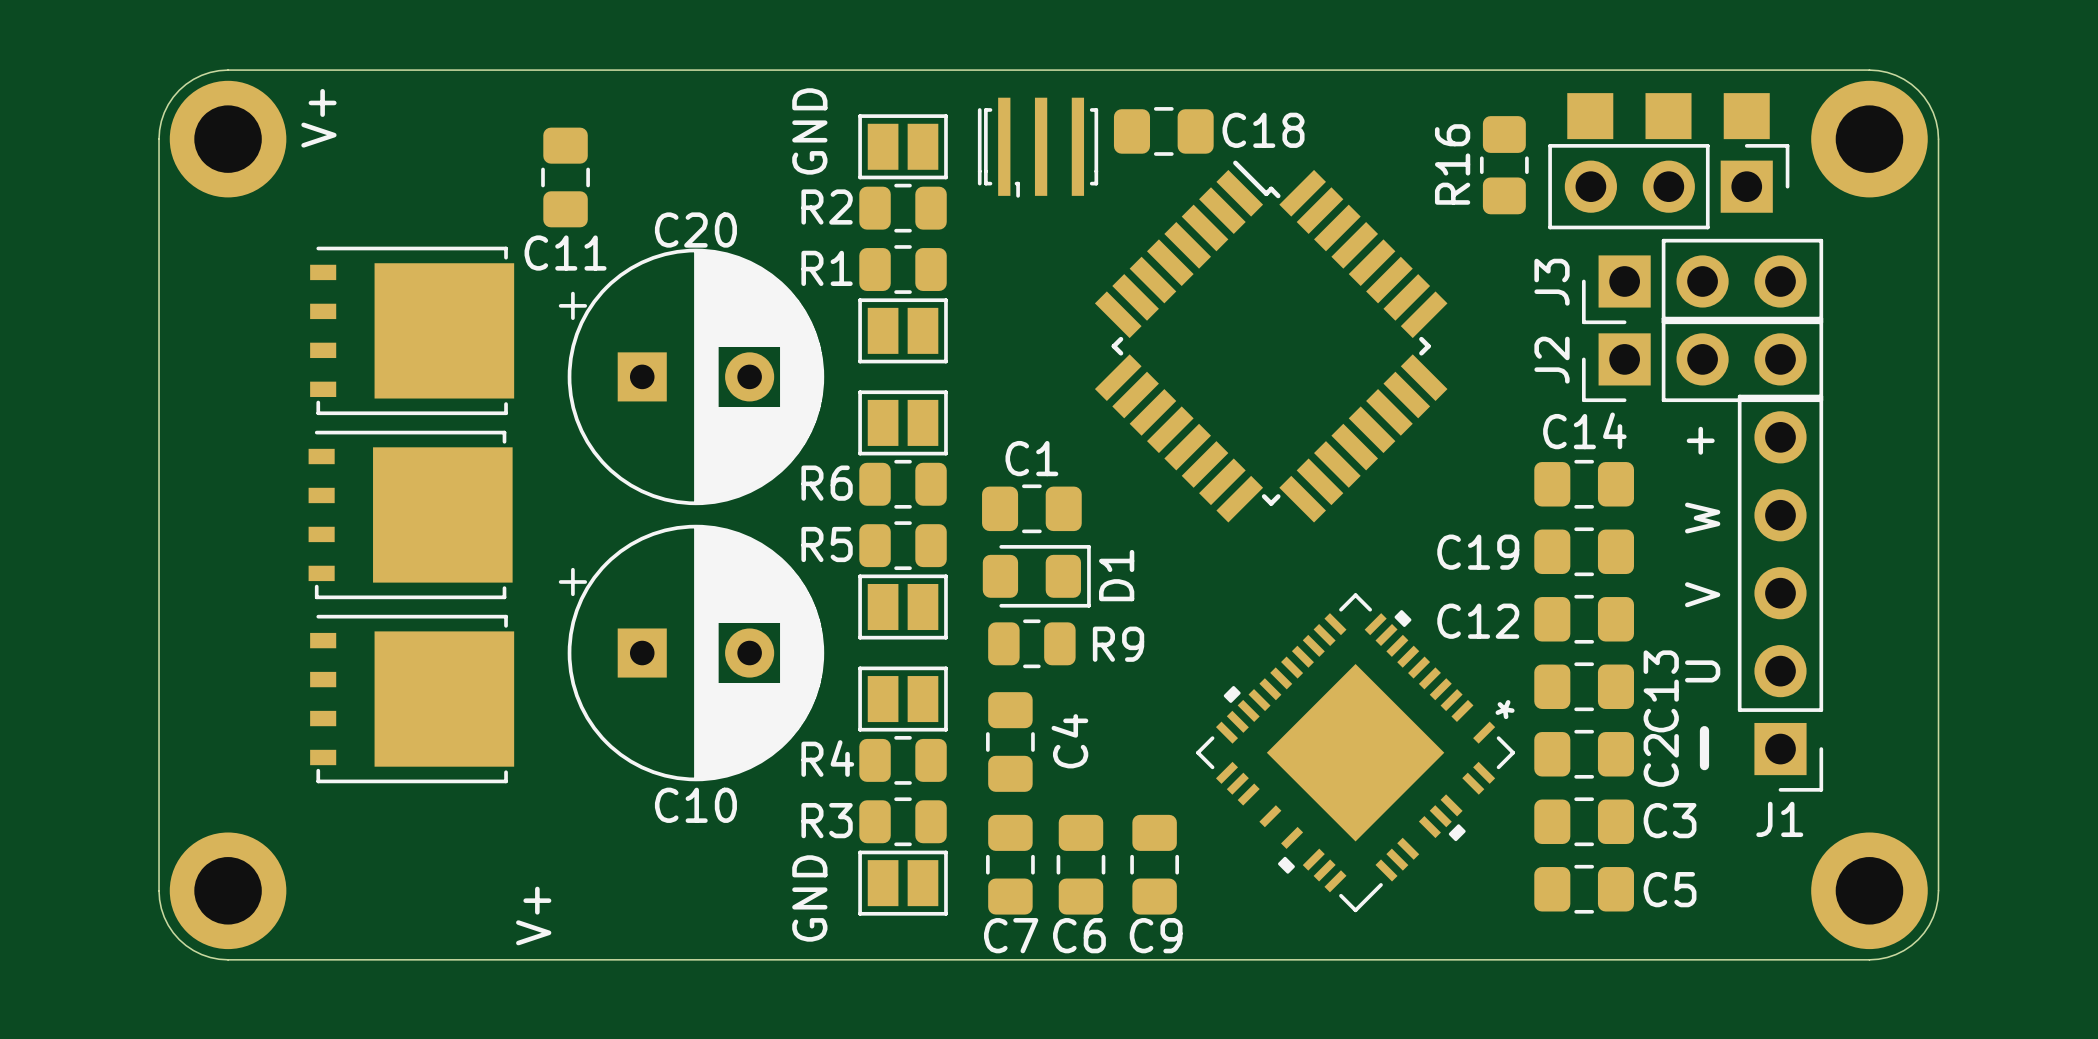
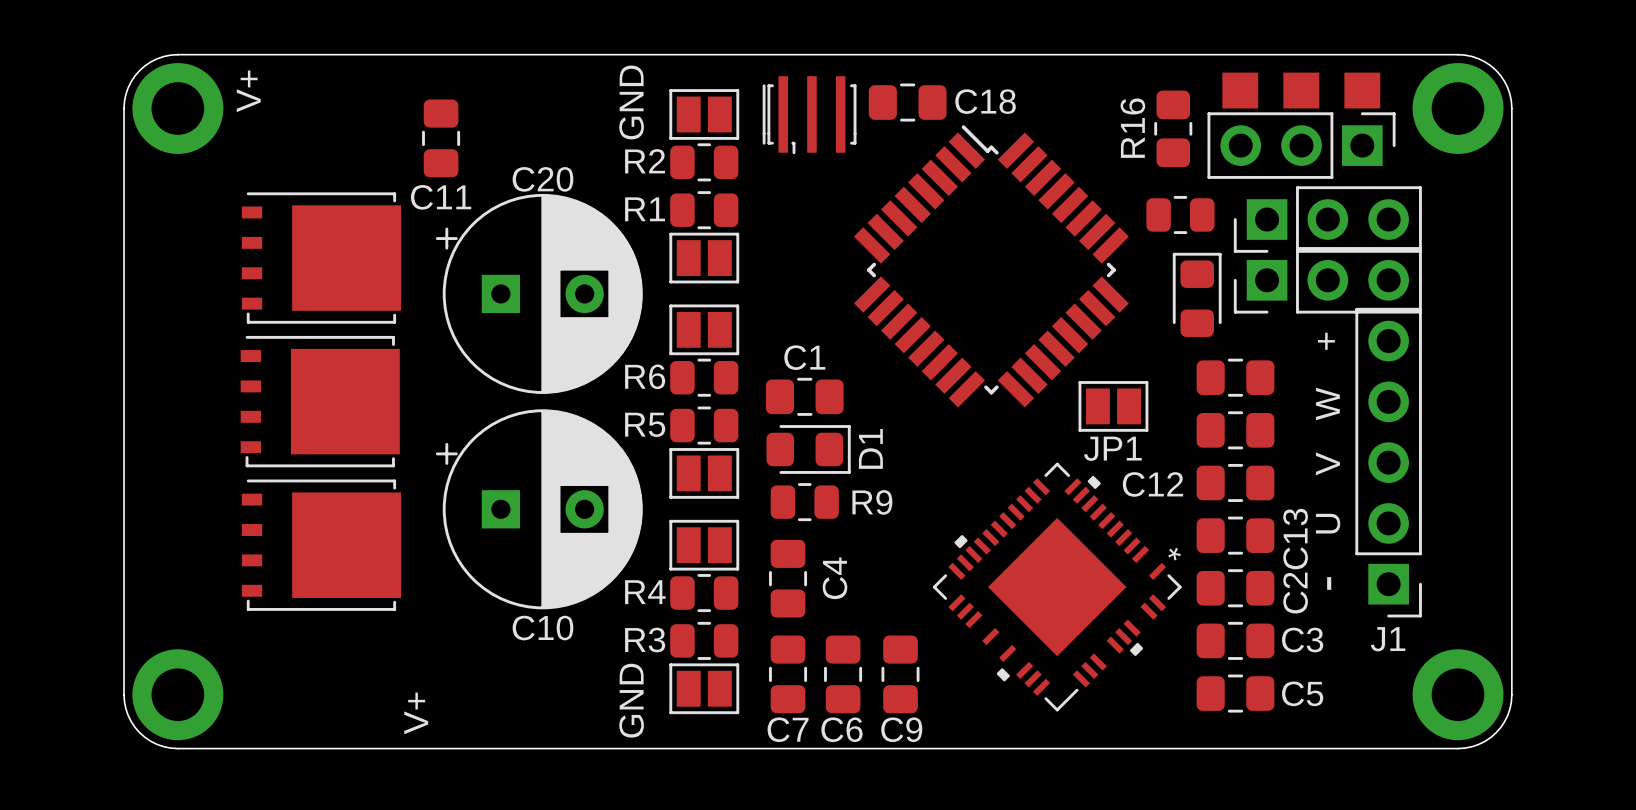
part: none -> (1180, 214)
J3 name: J3 (1552, 282) -> none
J2 name: J2 (1552, 360) -> none
part: none -> (1197, 294)
C14 name: C14 (1584, 430) -> none
JP1: none -> (1113, 406)
C19 name: C19 (1478, 552) -> none

